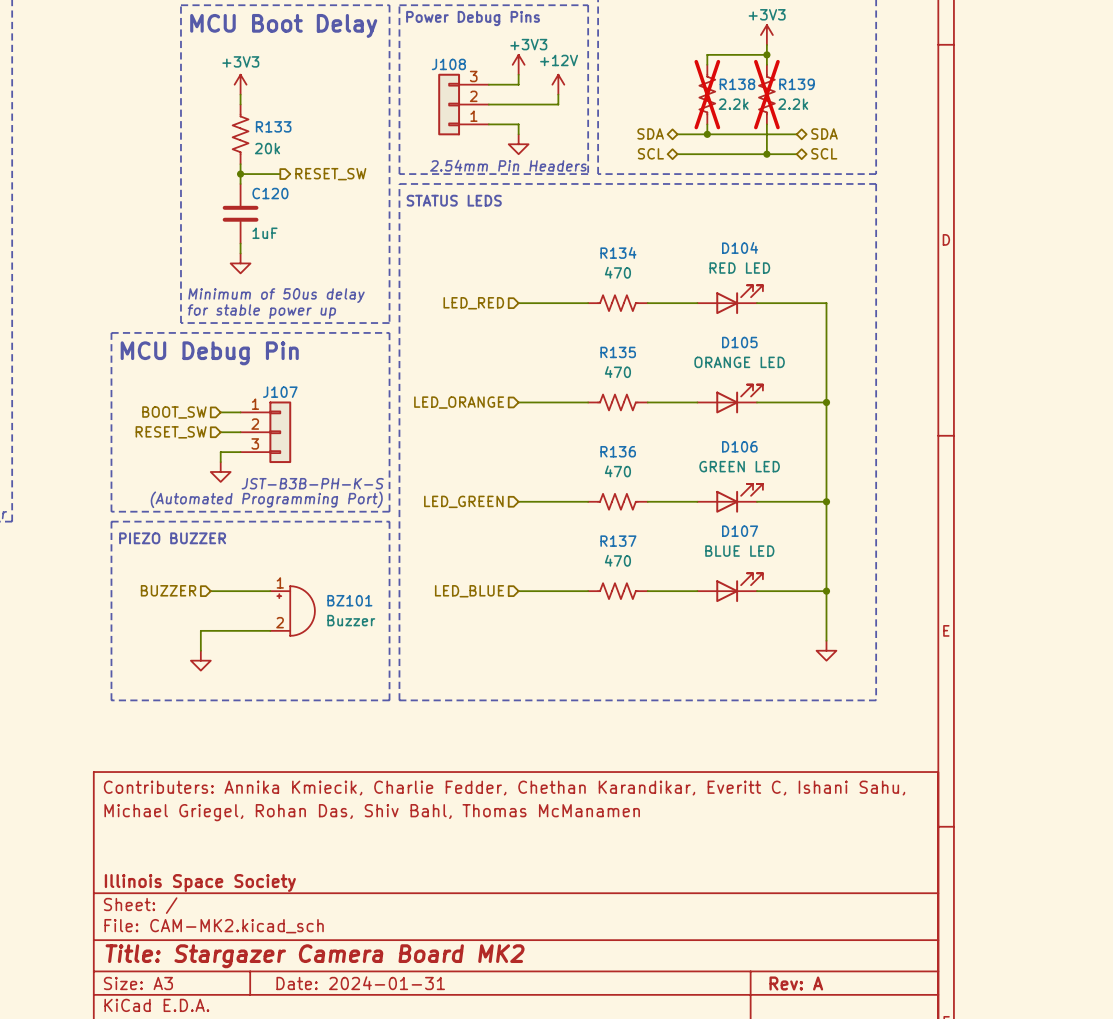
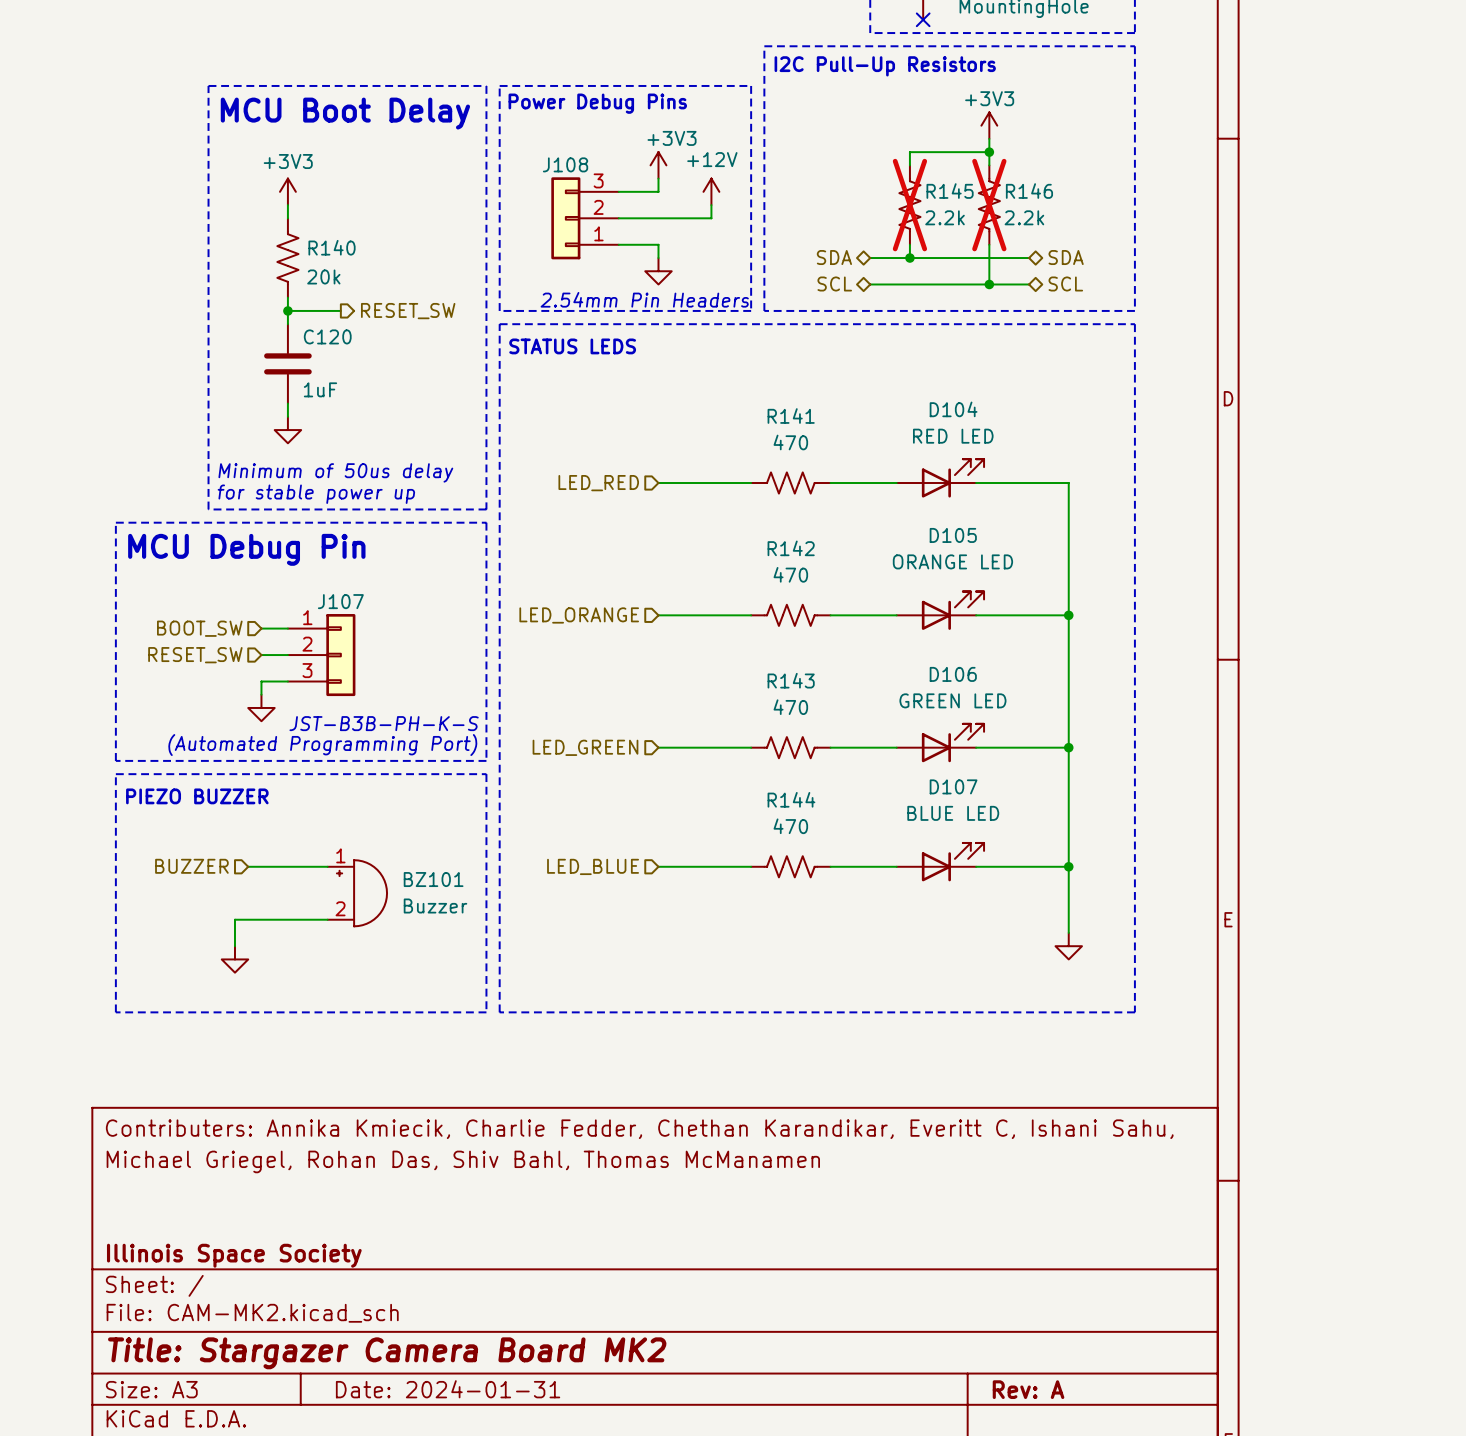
R138 name: R138 (737, 84) -> R145 (950, 191)
R139 name: R139 (797, 84) -> R146 (1029, 191)
R133 name: R133 (273, 126) -> R140 (332, 247)
R134 name: R134 (618, 252) -> R141 (791, 416)
R135 name: R135 (618, 352) -> R142 (791, 548)
R136 name: R136 (618, 451) -> R143 (791, 680)
R137 name: R137 (618, 541) -> R144 (791, 799)

